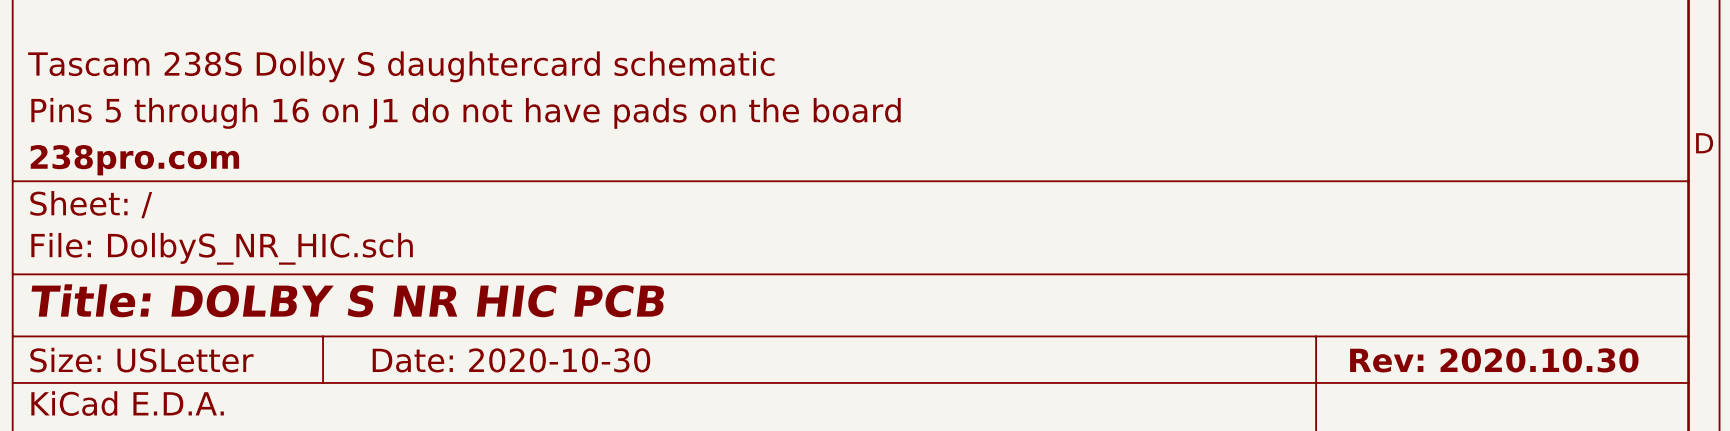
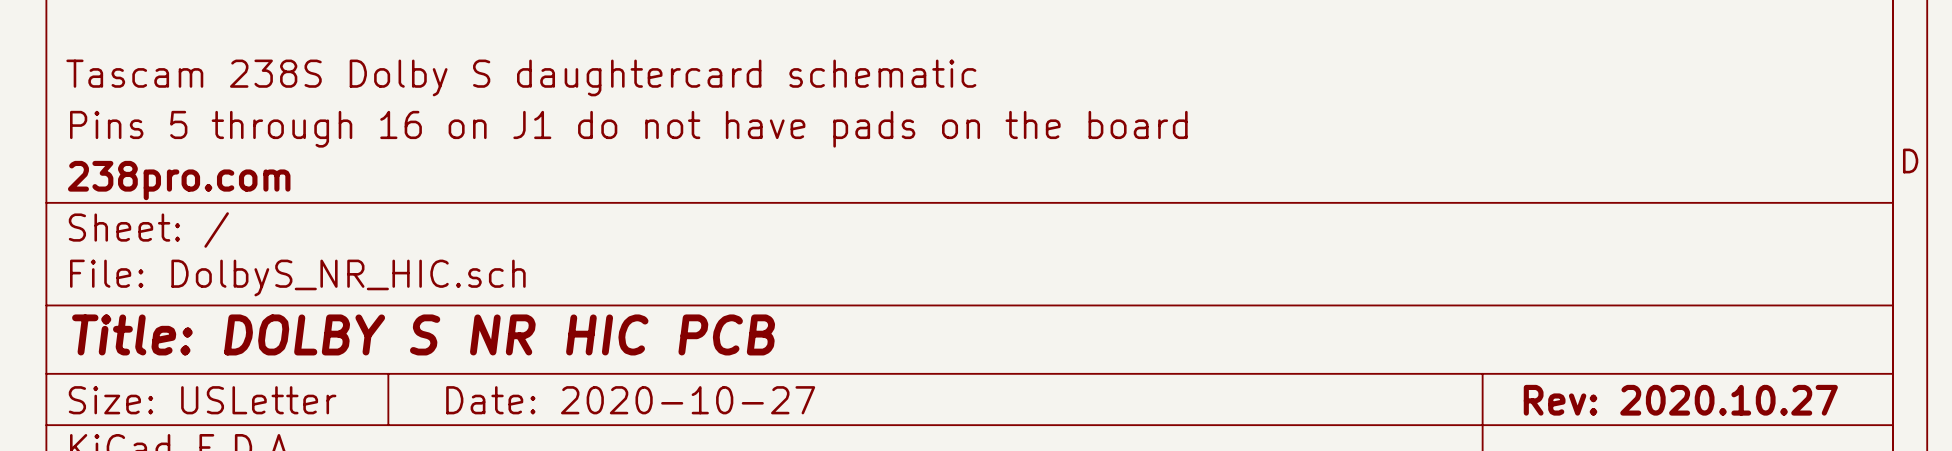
title block: Date: 2020-10-30 (511, 360) -> Date: 2020-10-27 (630, 400)
title block: Rev: 2020.10.30 (1494, 360) -> Rev: 2020.10.27 (1680, 400)

